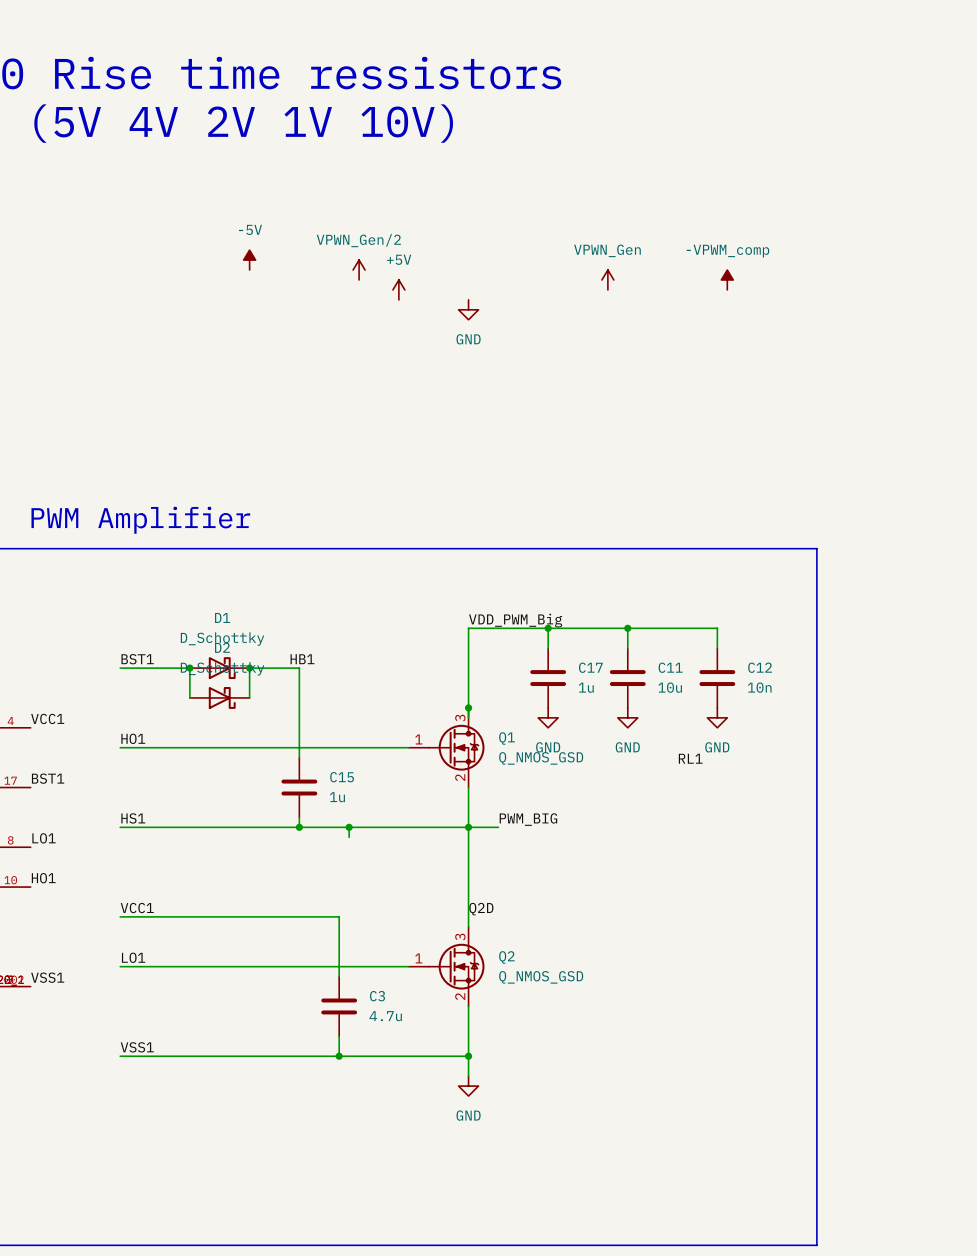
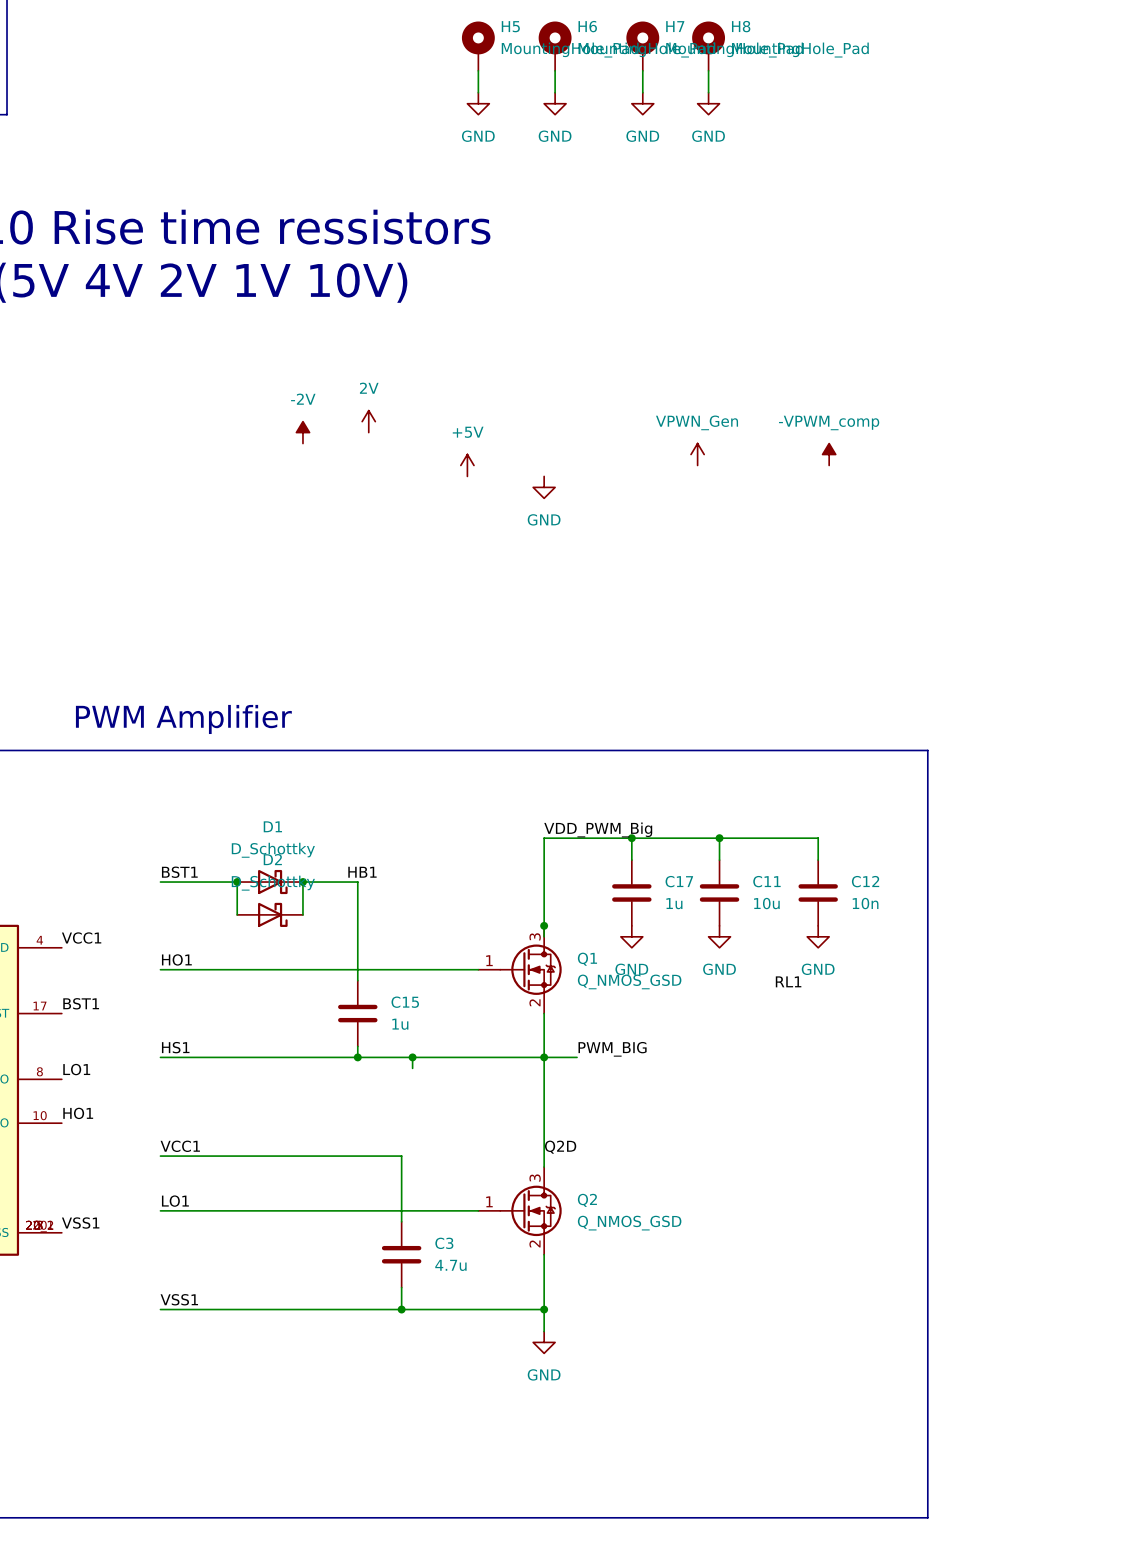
power symbol: none -> 2V (368, 421)
power symbol: -5V (249, 260) -> -2V (302, 432)
power symbol: VPWN_Gen/2 (359, 270) -> none

